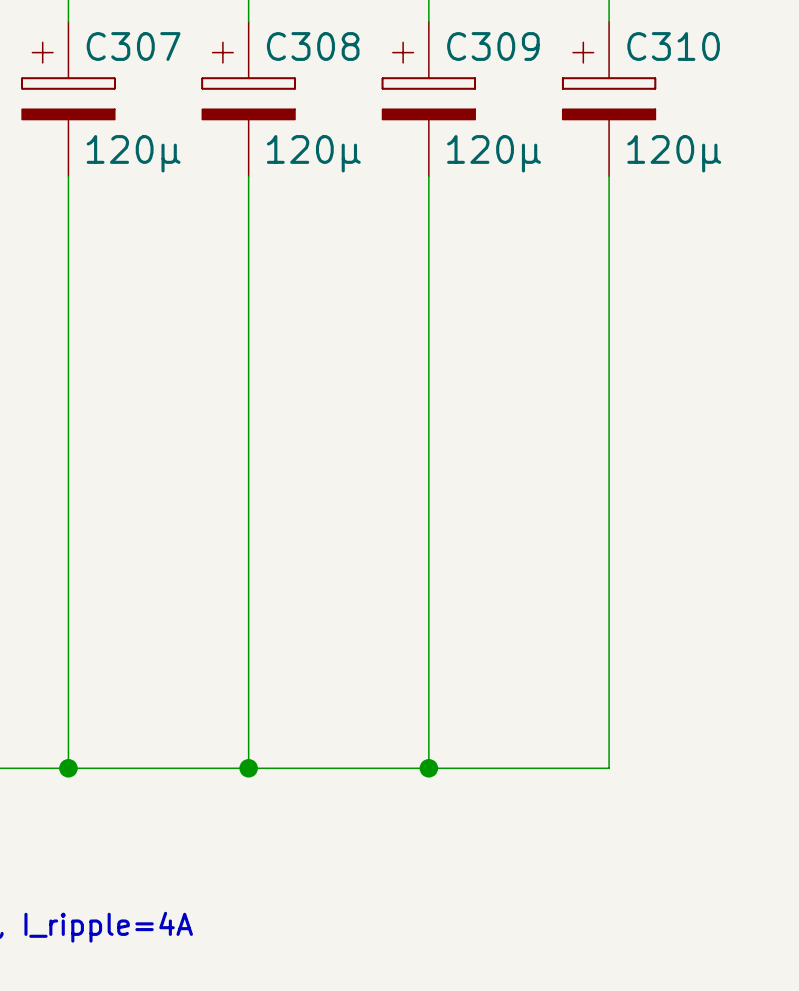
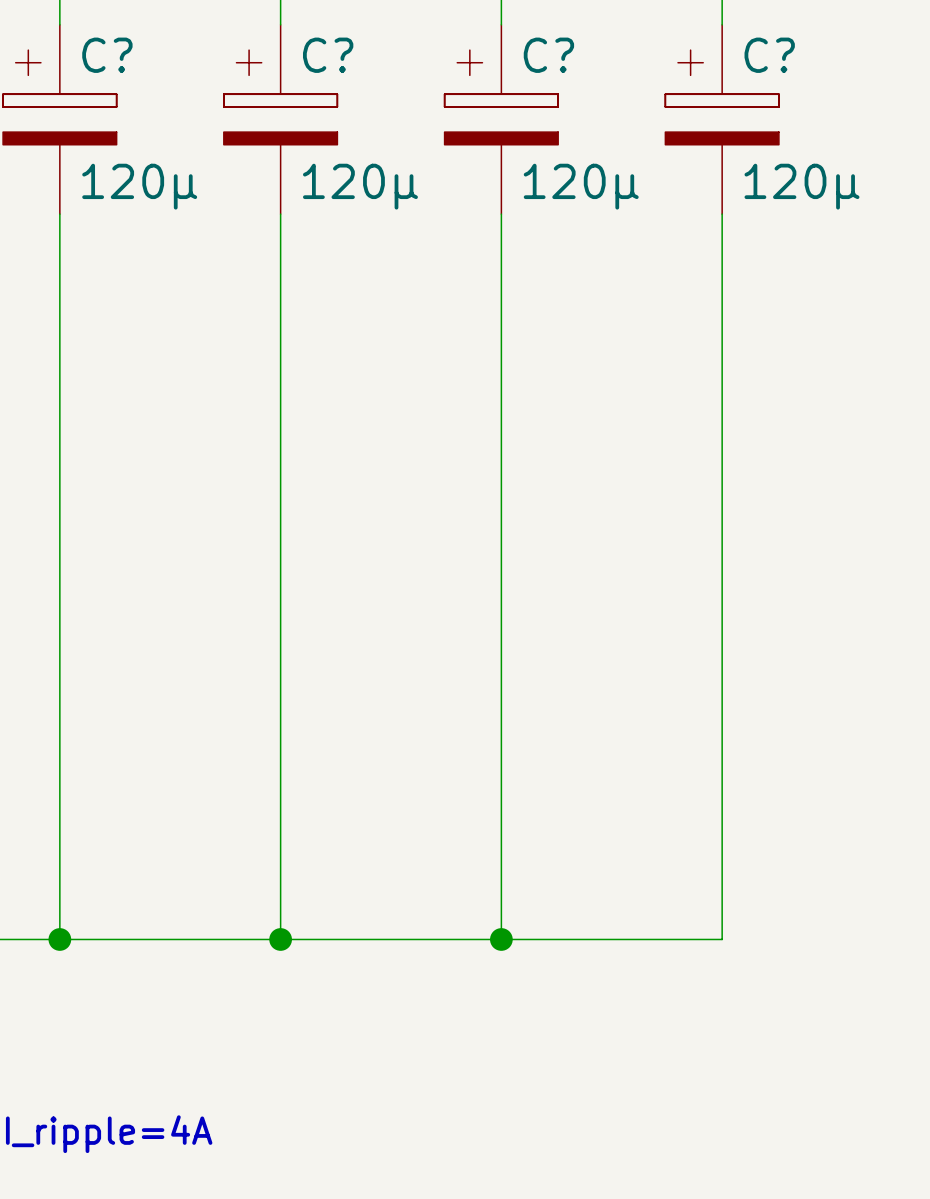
C307 name: C307 (133, 46) -> C? (107, 55)
C308 name: C308 (313, 46) -> C? (328, 55)
C309 name: C309 (493, 46) -> C? (548, 55)
C310 name: C310 (673, 46) -> C? (769, 55)

